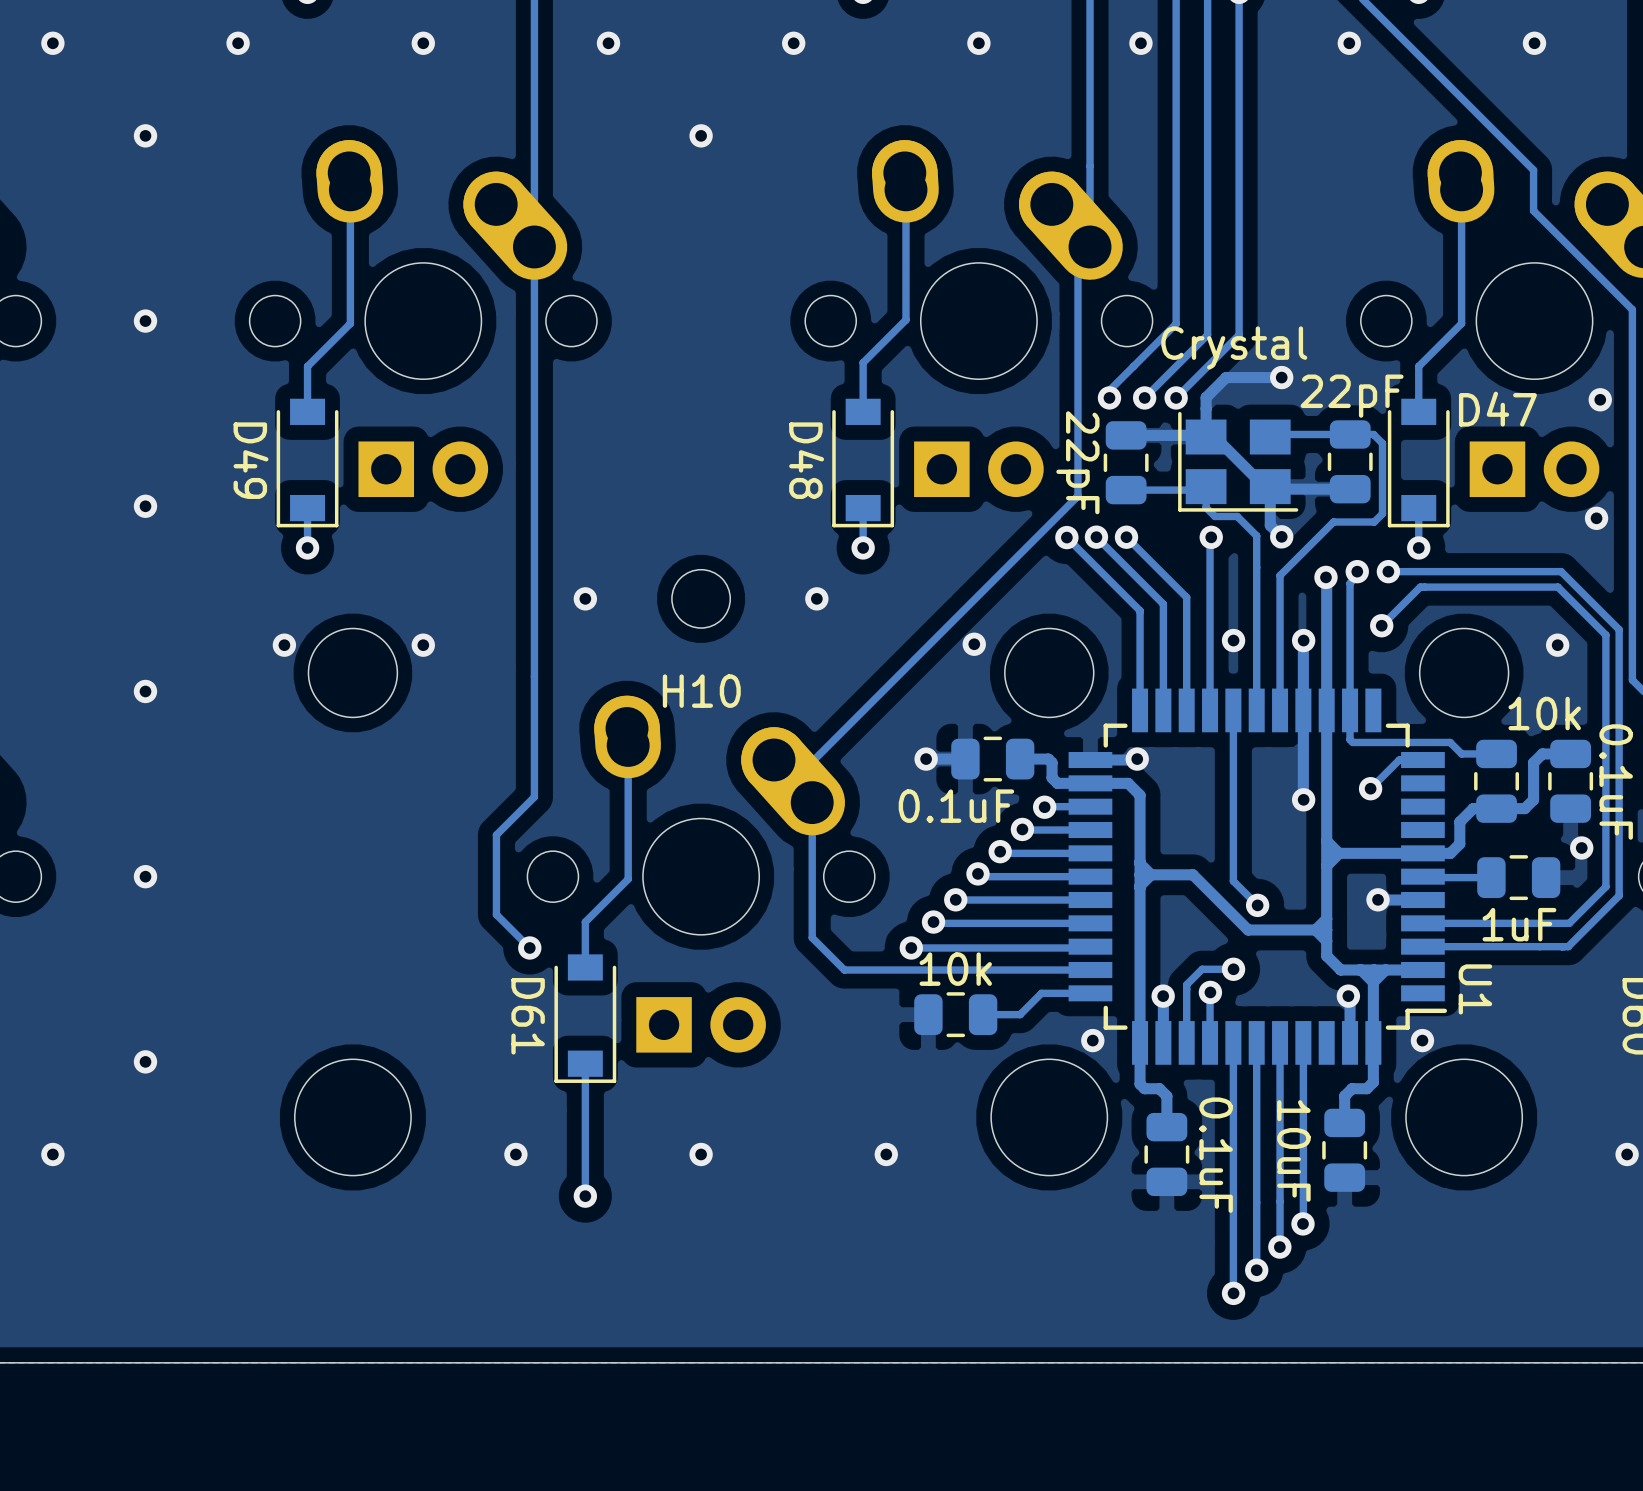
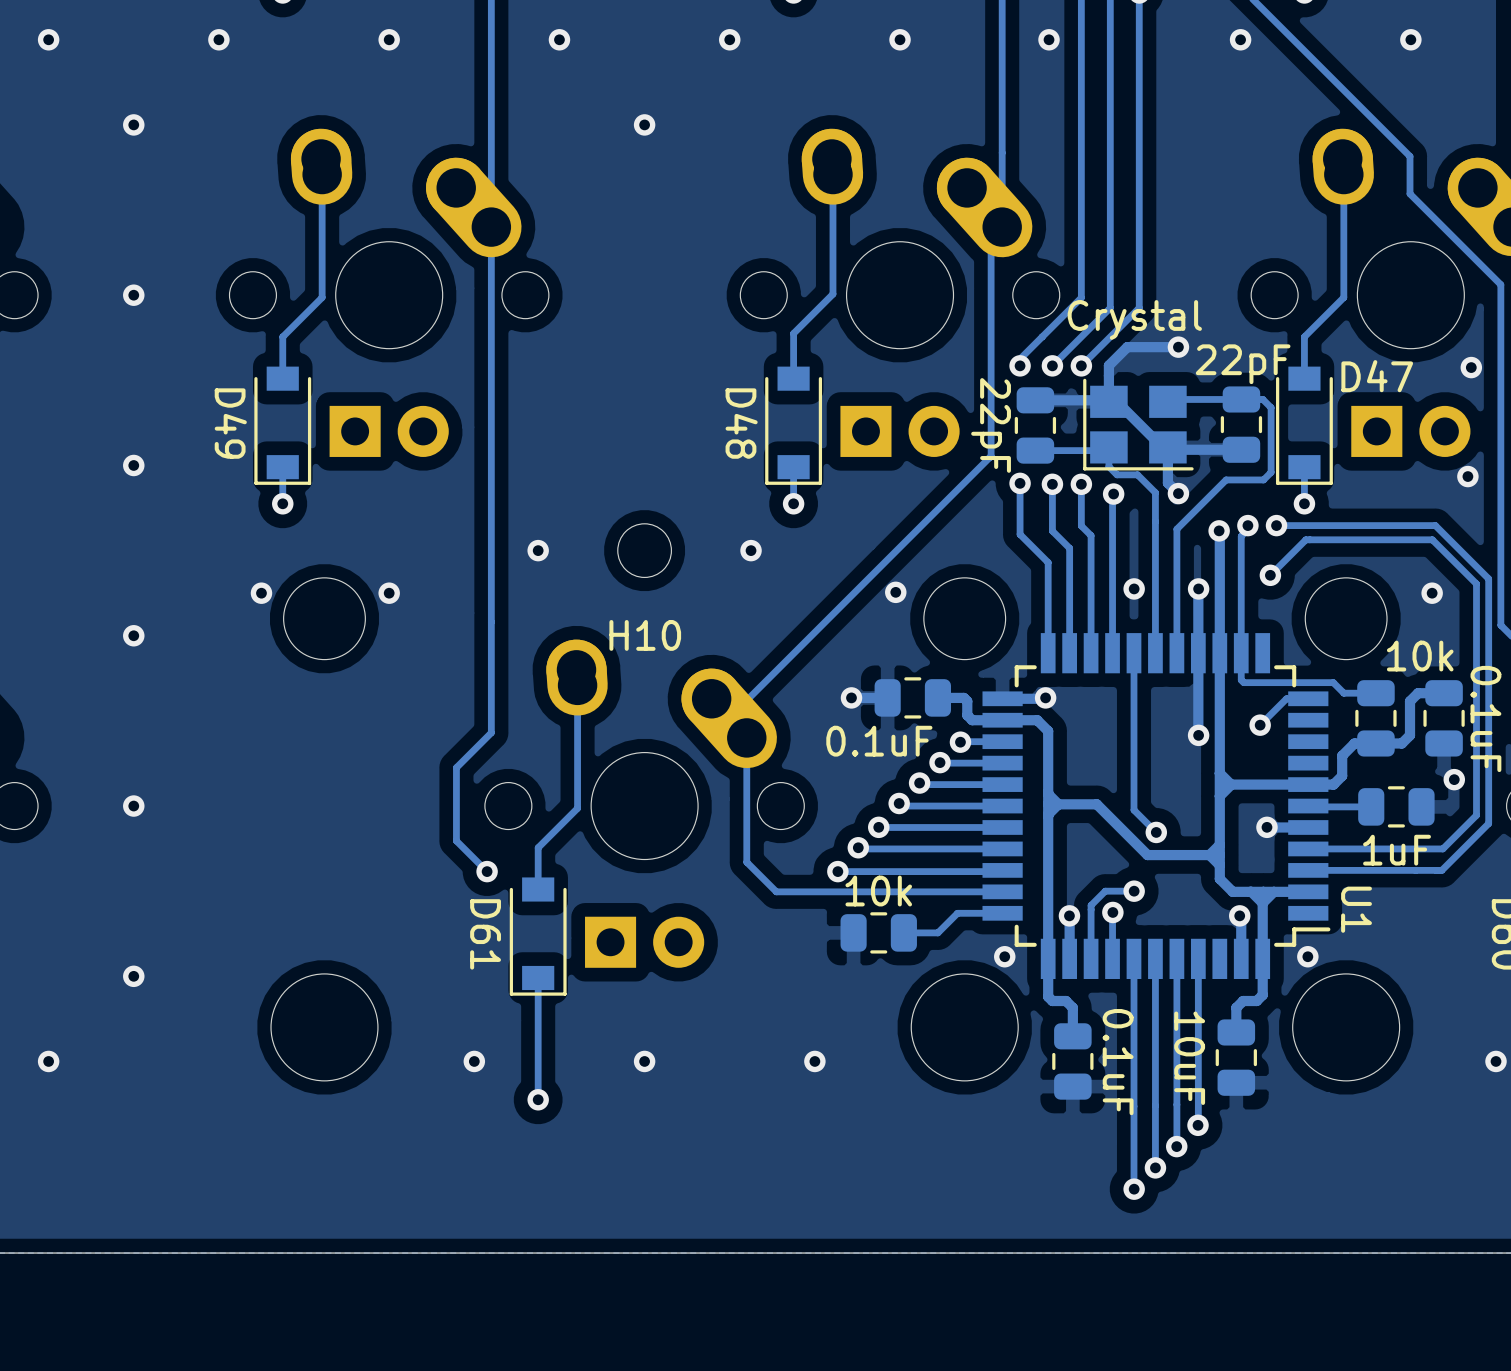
via: none -> (1020, 483)
via: none -> (1052, 484)
via: none -> (1081, 484)
track: (1066, 537) (1140, 611) -> (1020, 485) (1020, 534) (1048, 562)
via: (1066, 537) -> none
track: (1096, 537) (1163, 604) -> (1052, 484) (1052, 531) (1069, 548) (1069, 555)
via: (1096, 537) -> none
track: (1126, 537) (1186, 597) -> (1081, 484) (1081, 525) (1091, 535) (1091, 549)
via: (1126, 537) -> none

